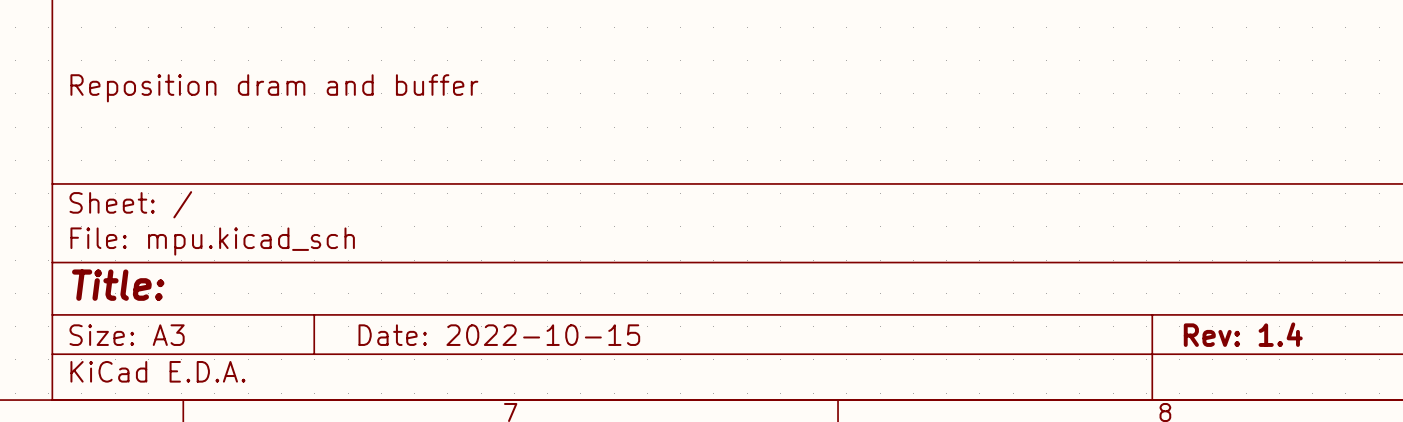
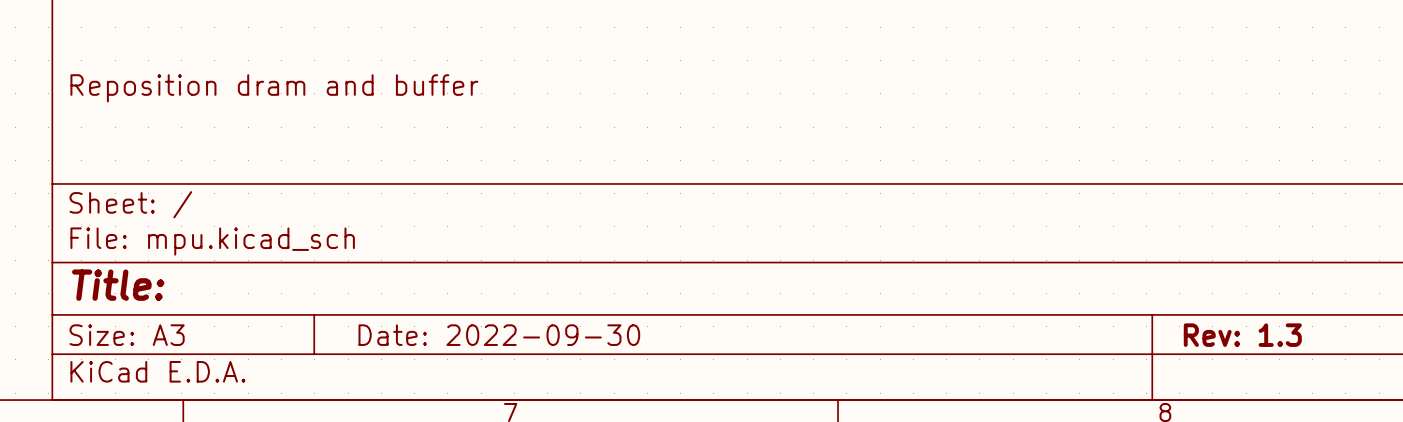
title block: Rev: 1.4 (1243, 334) -> Rev: 1.3 (1242, 335)
title block: Date: 2022-10-15 (499, 335) -> Date: 2022-09-30 (499, 335)

